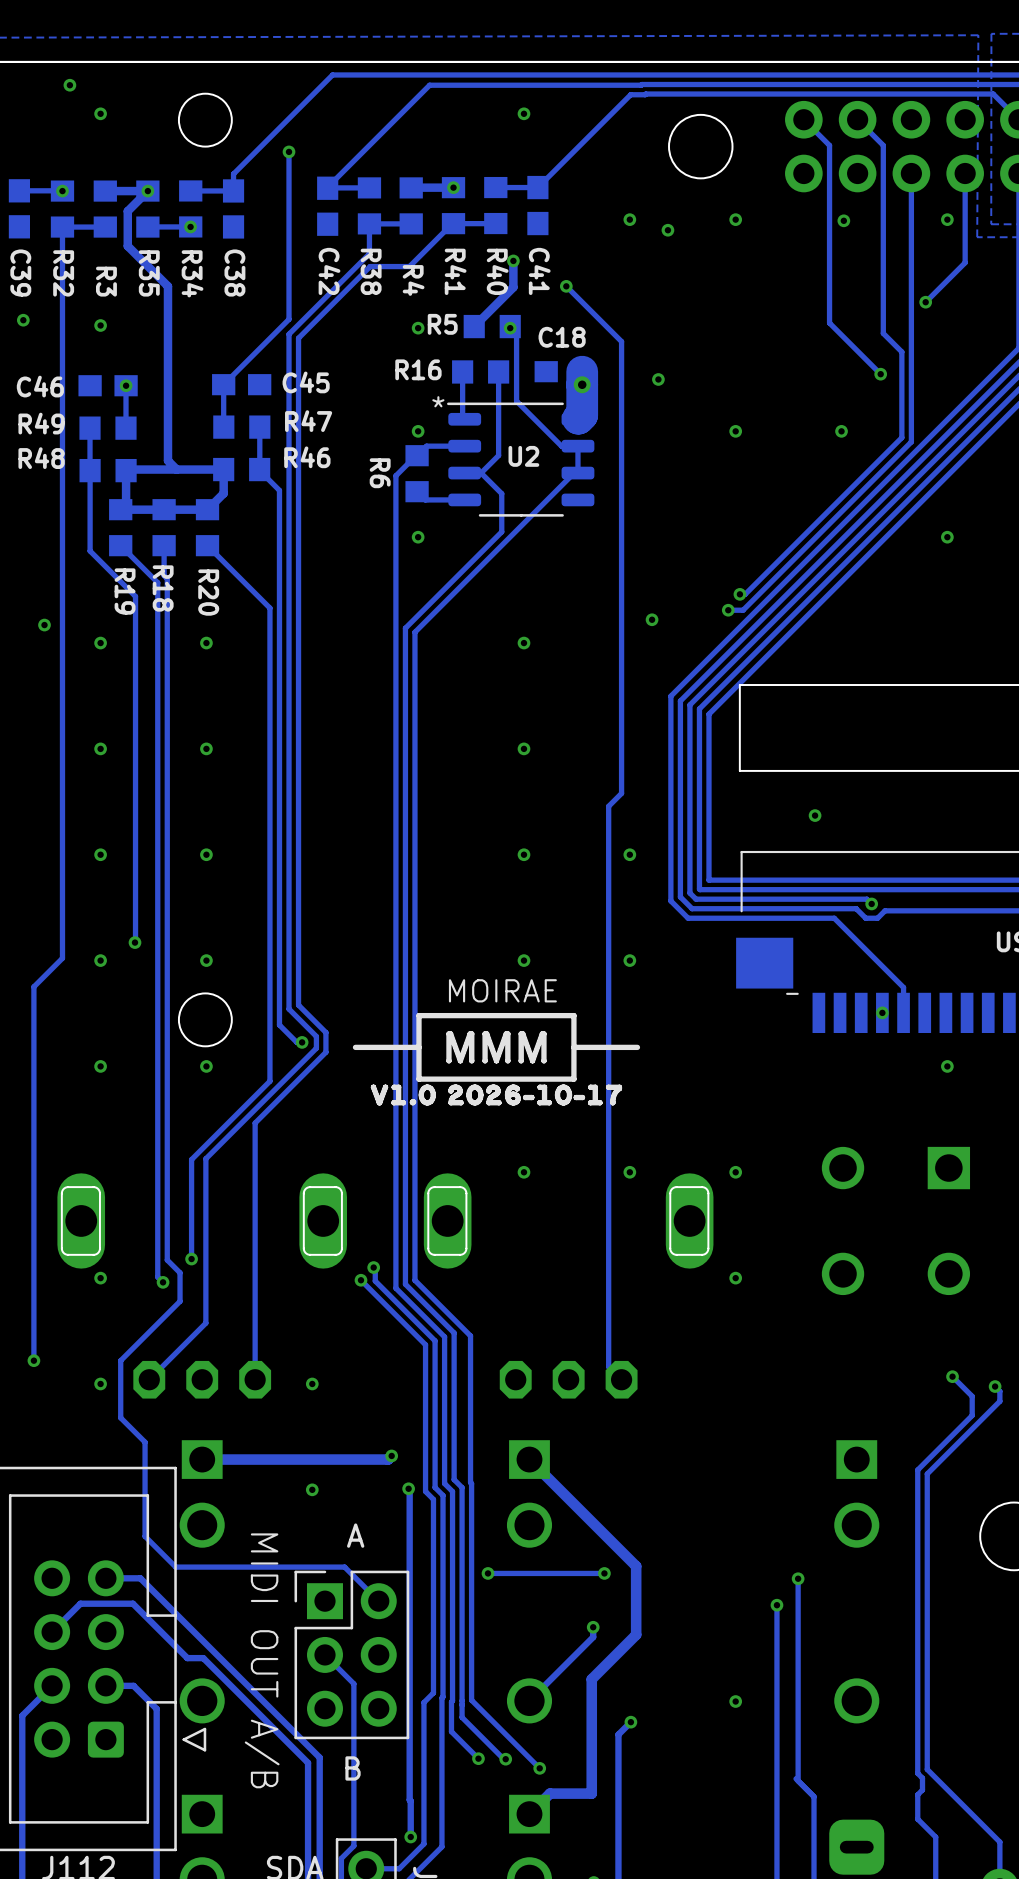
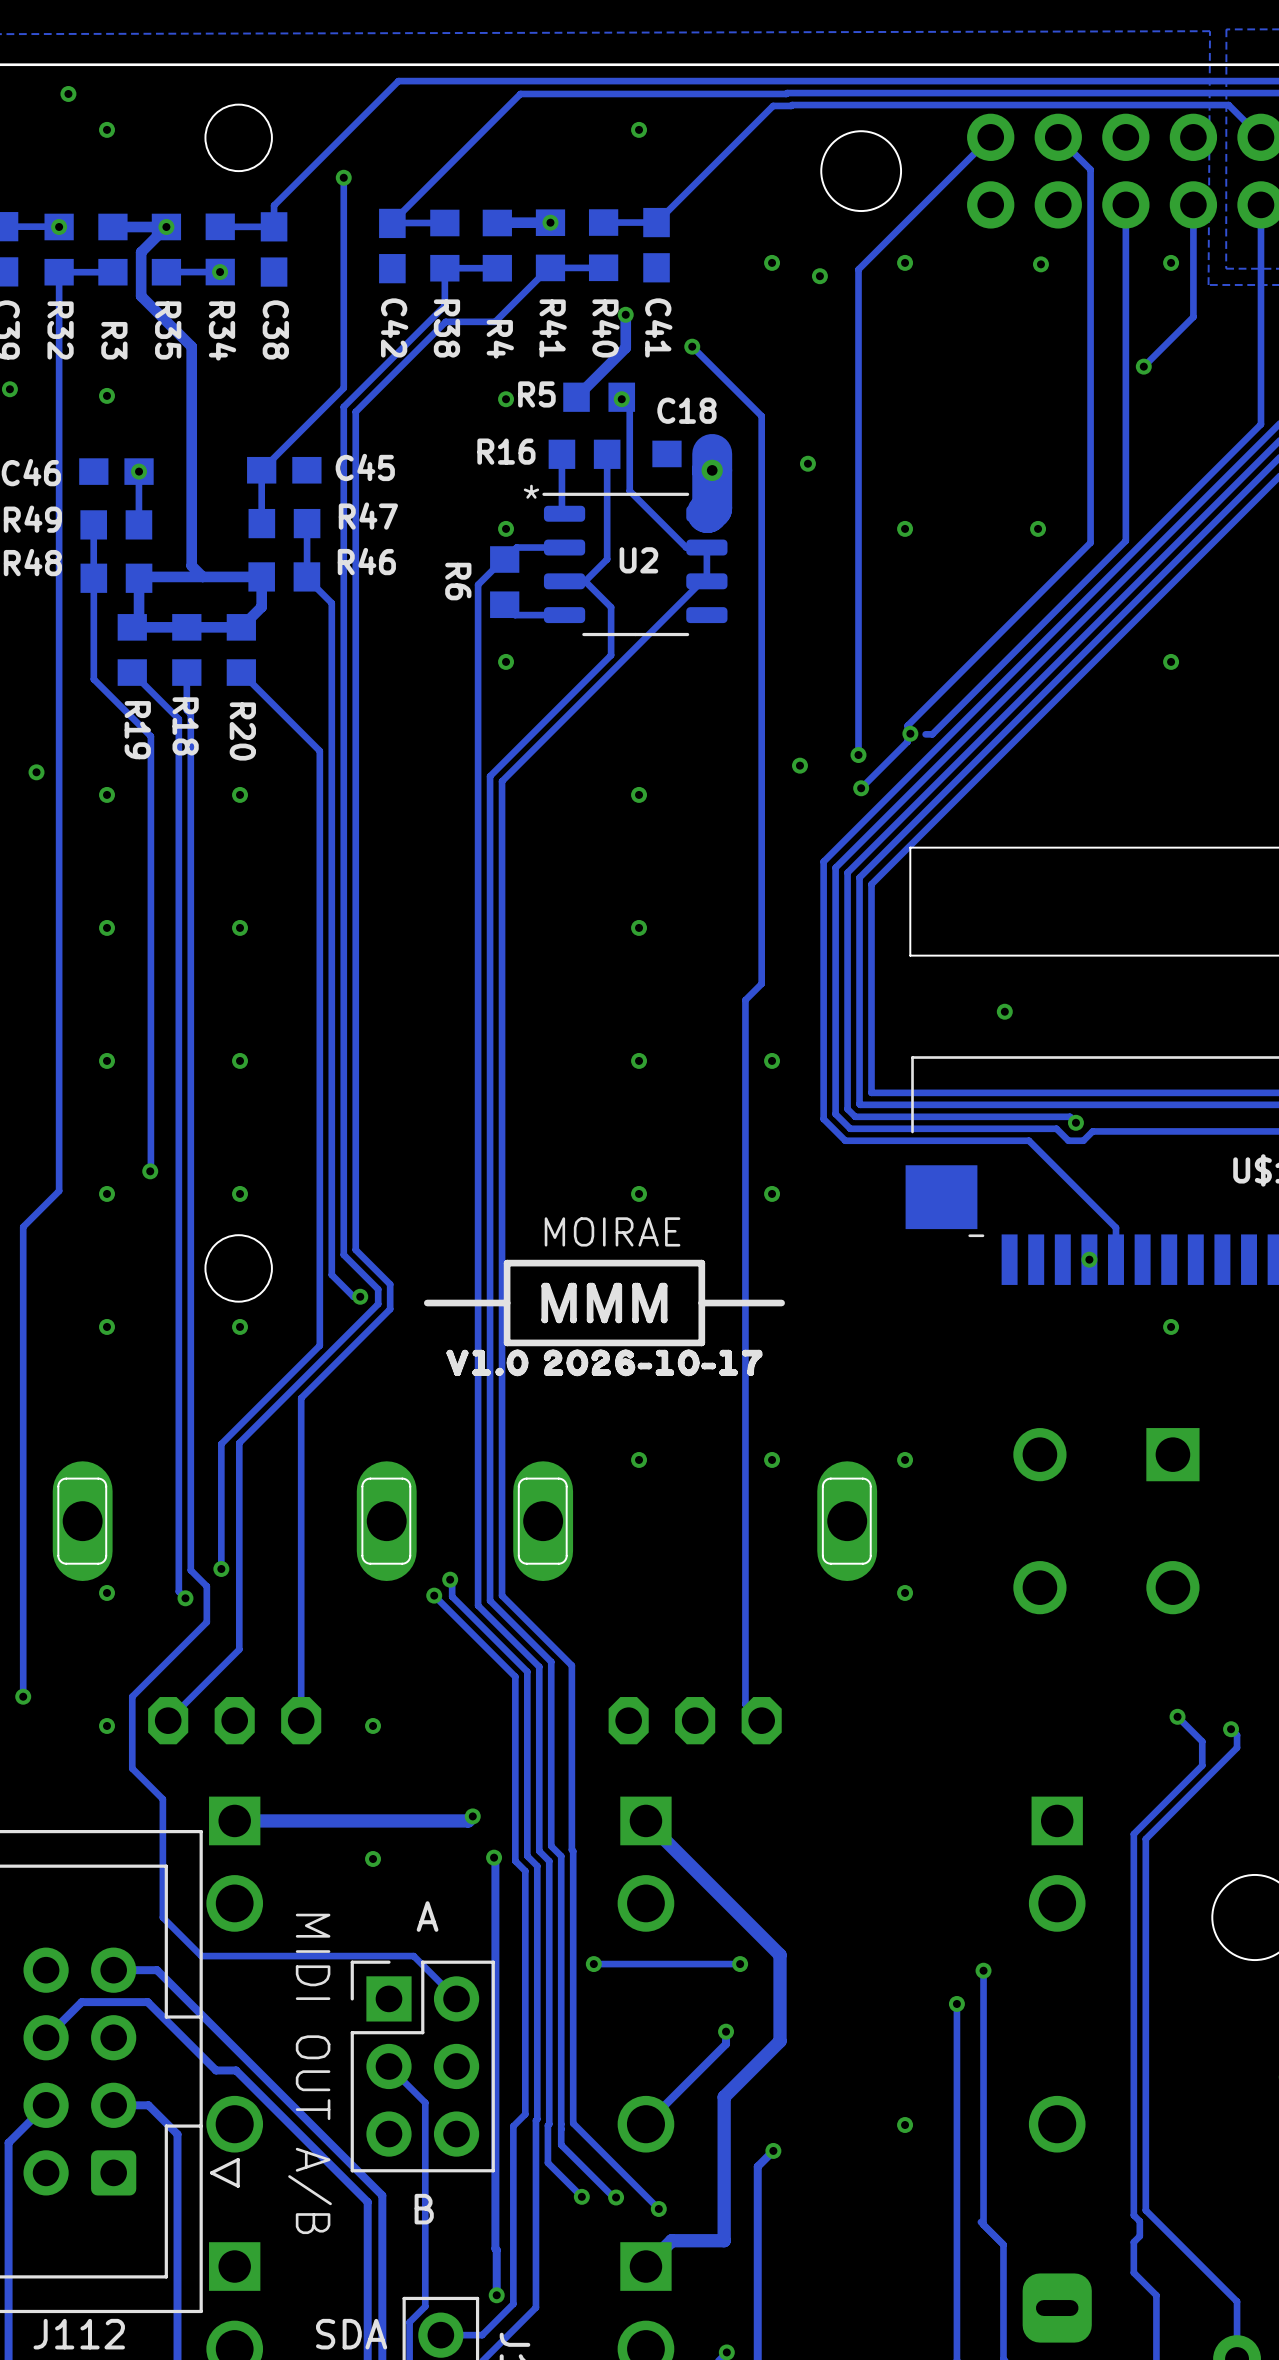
track: (803, 119) (829, 145) (829, 323) (880, 374) -> (990, 137) (858, 269) (858, 755)
track: (883, 333) (901, 351) (901, 437) (745, 594) (739, 594) -> (1090, 405) (1090, 542) (907, 725) (907, 741) (861, 788)
via: (880, 374) -> none
track: (911, 440) (743, 610) (728, 610) -> (1125, 540) (932, 734) (925, 734)
via: (728, 610) -> none
via: none -> (858, 755)
via: none -> (861, 788)

